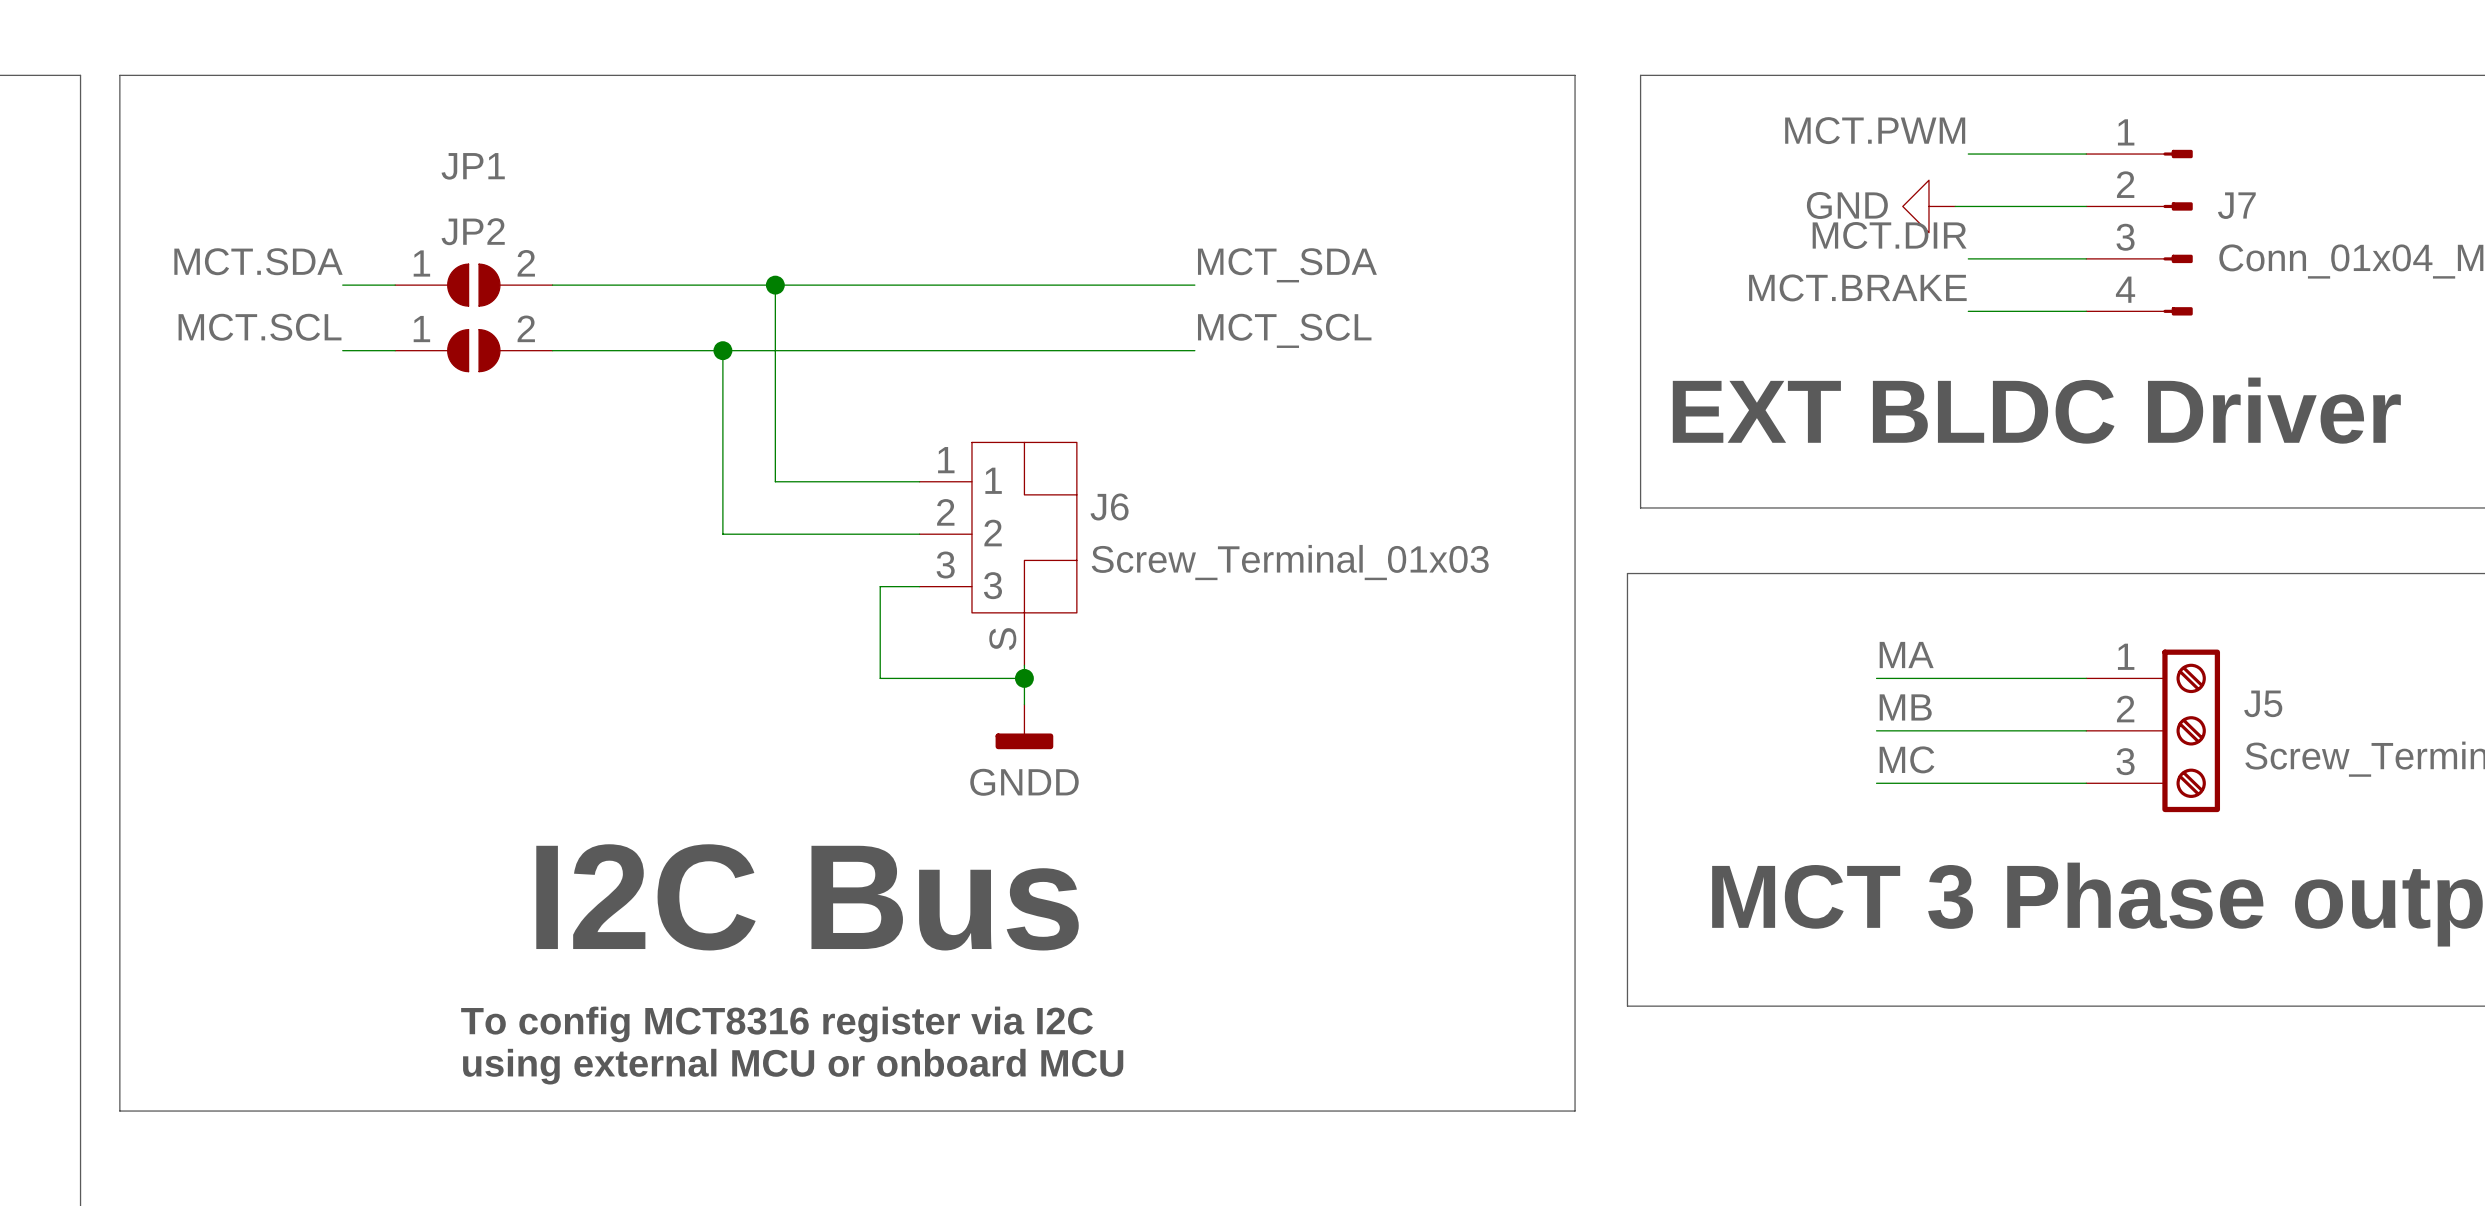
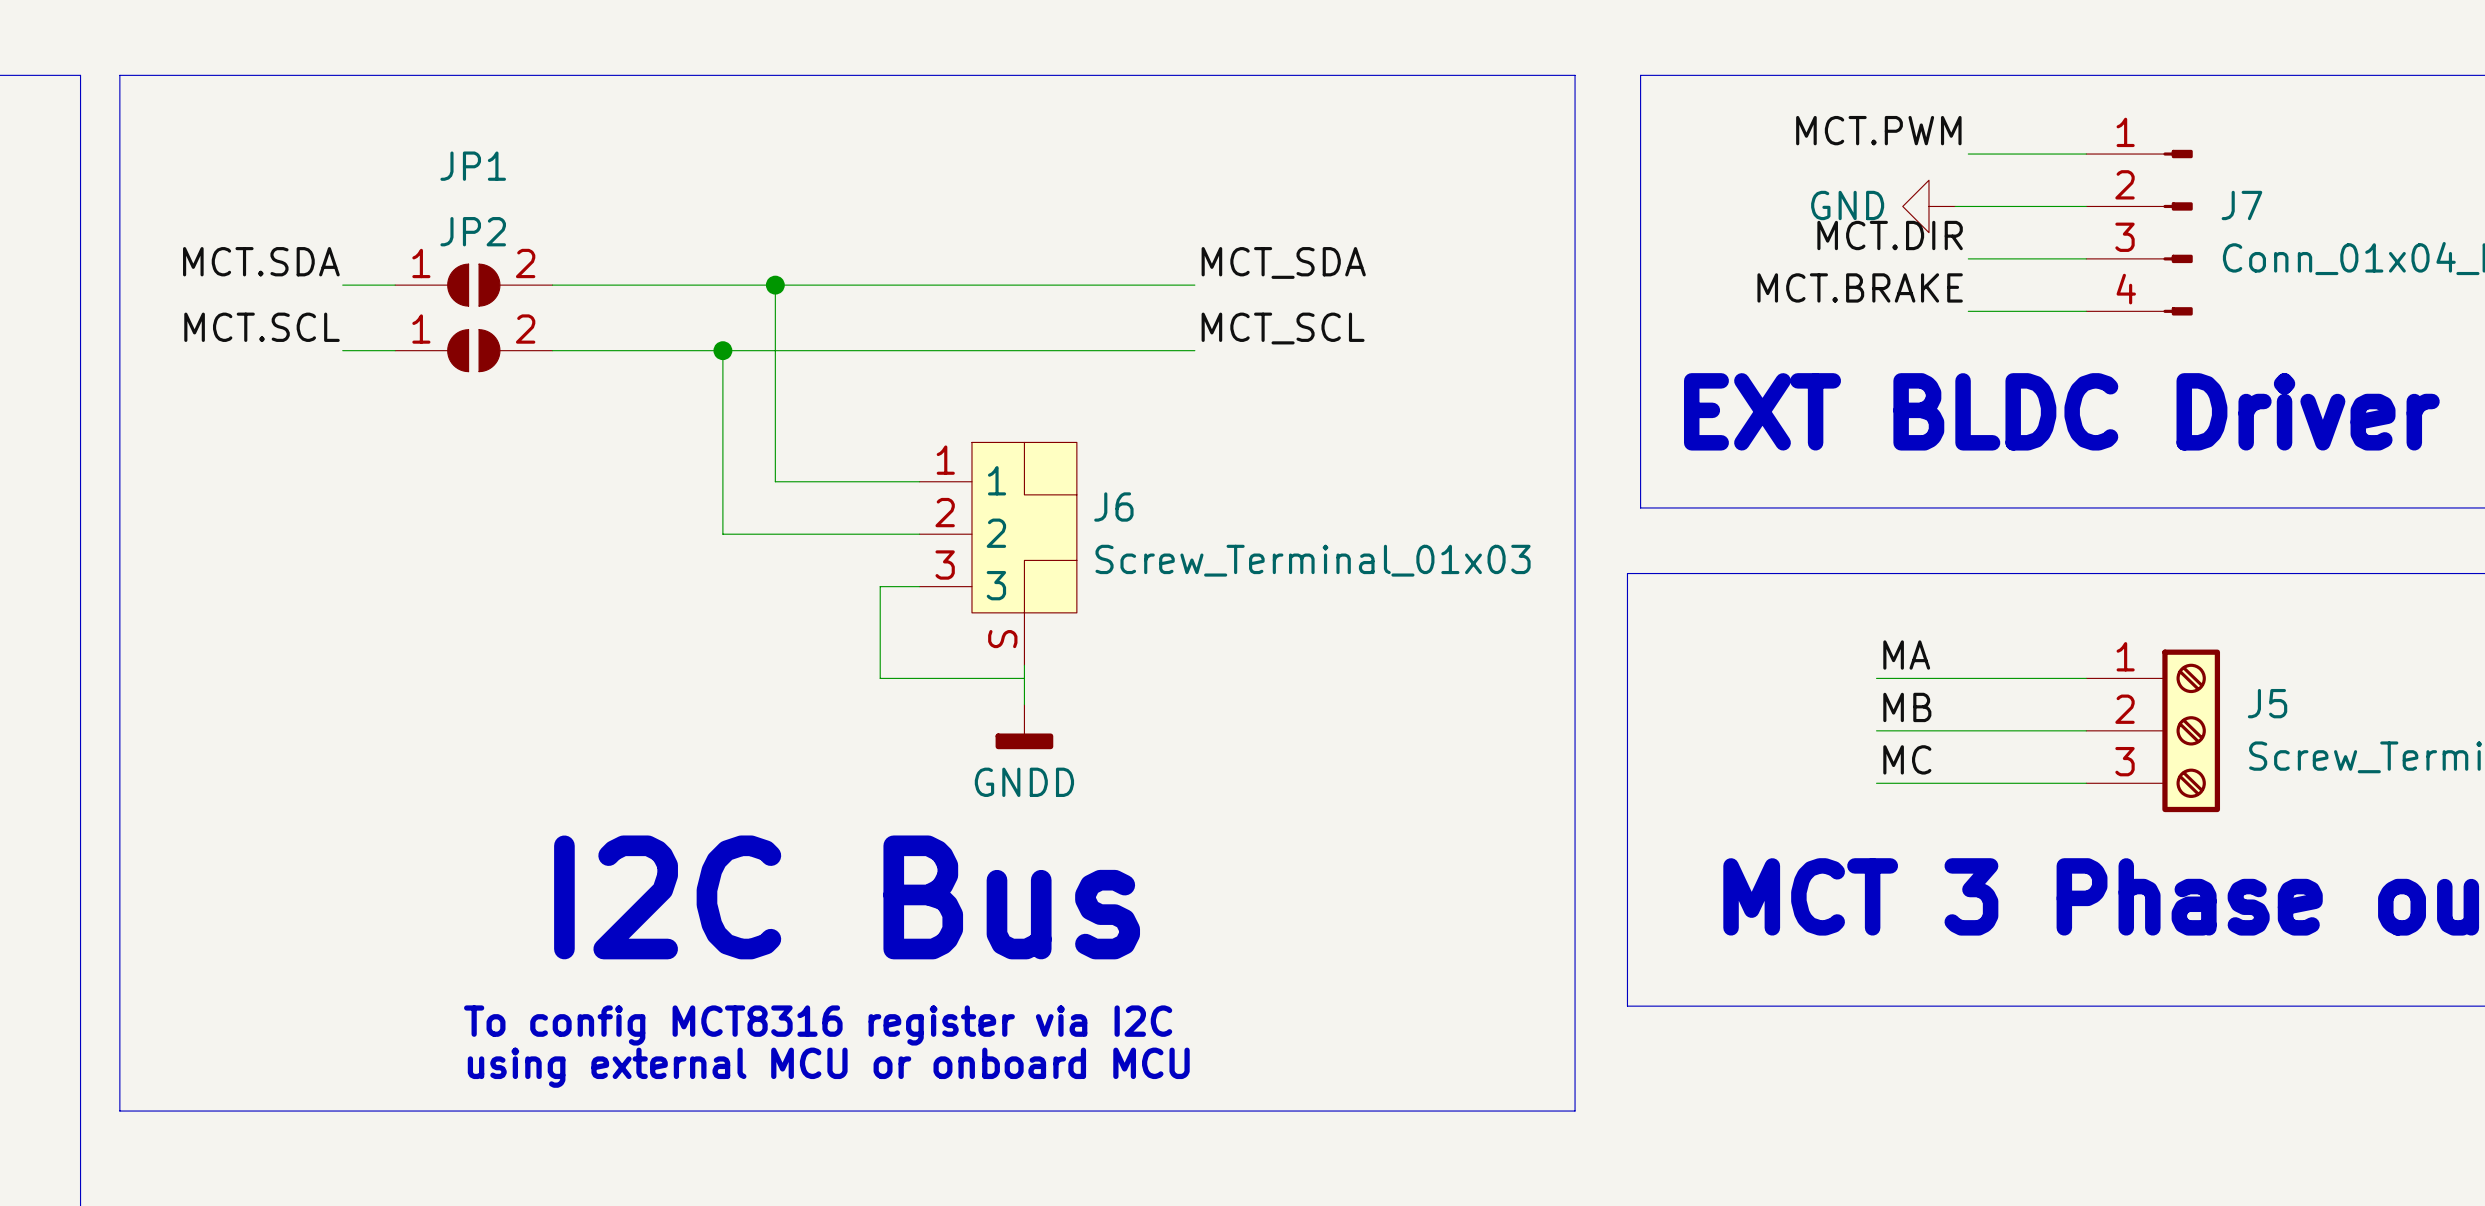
junction: (1024, 678) -> none

